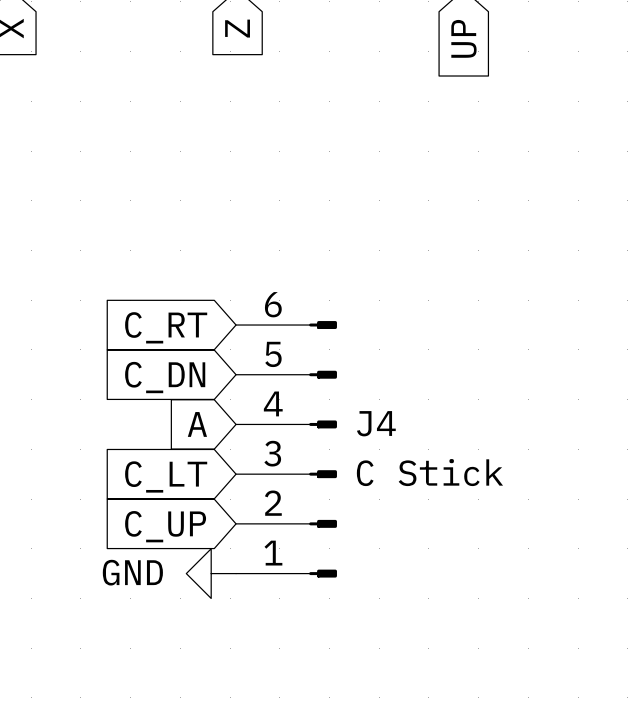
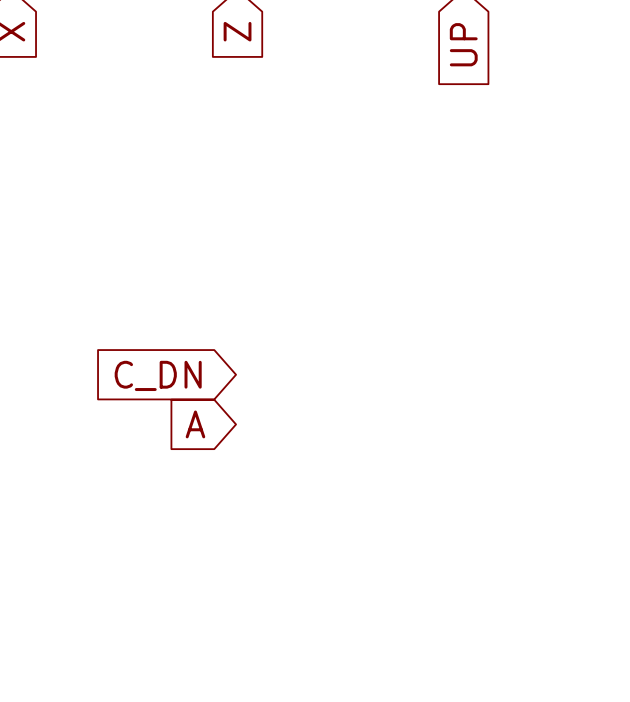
global label: C_RT (166, 327) -> none
J4: C Stick (286, 449) -> none
global label: C_LT (166, 476) -> none
global label: C_UP (165, 526) -> none
power symbol: GND (211, 573) -> none

